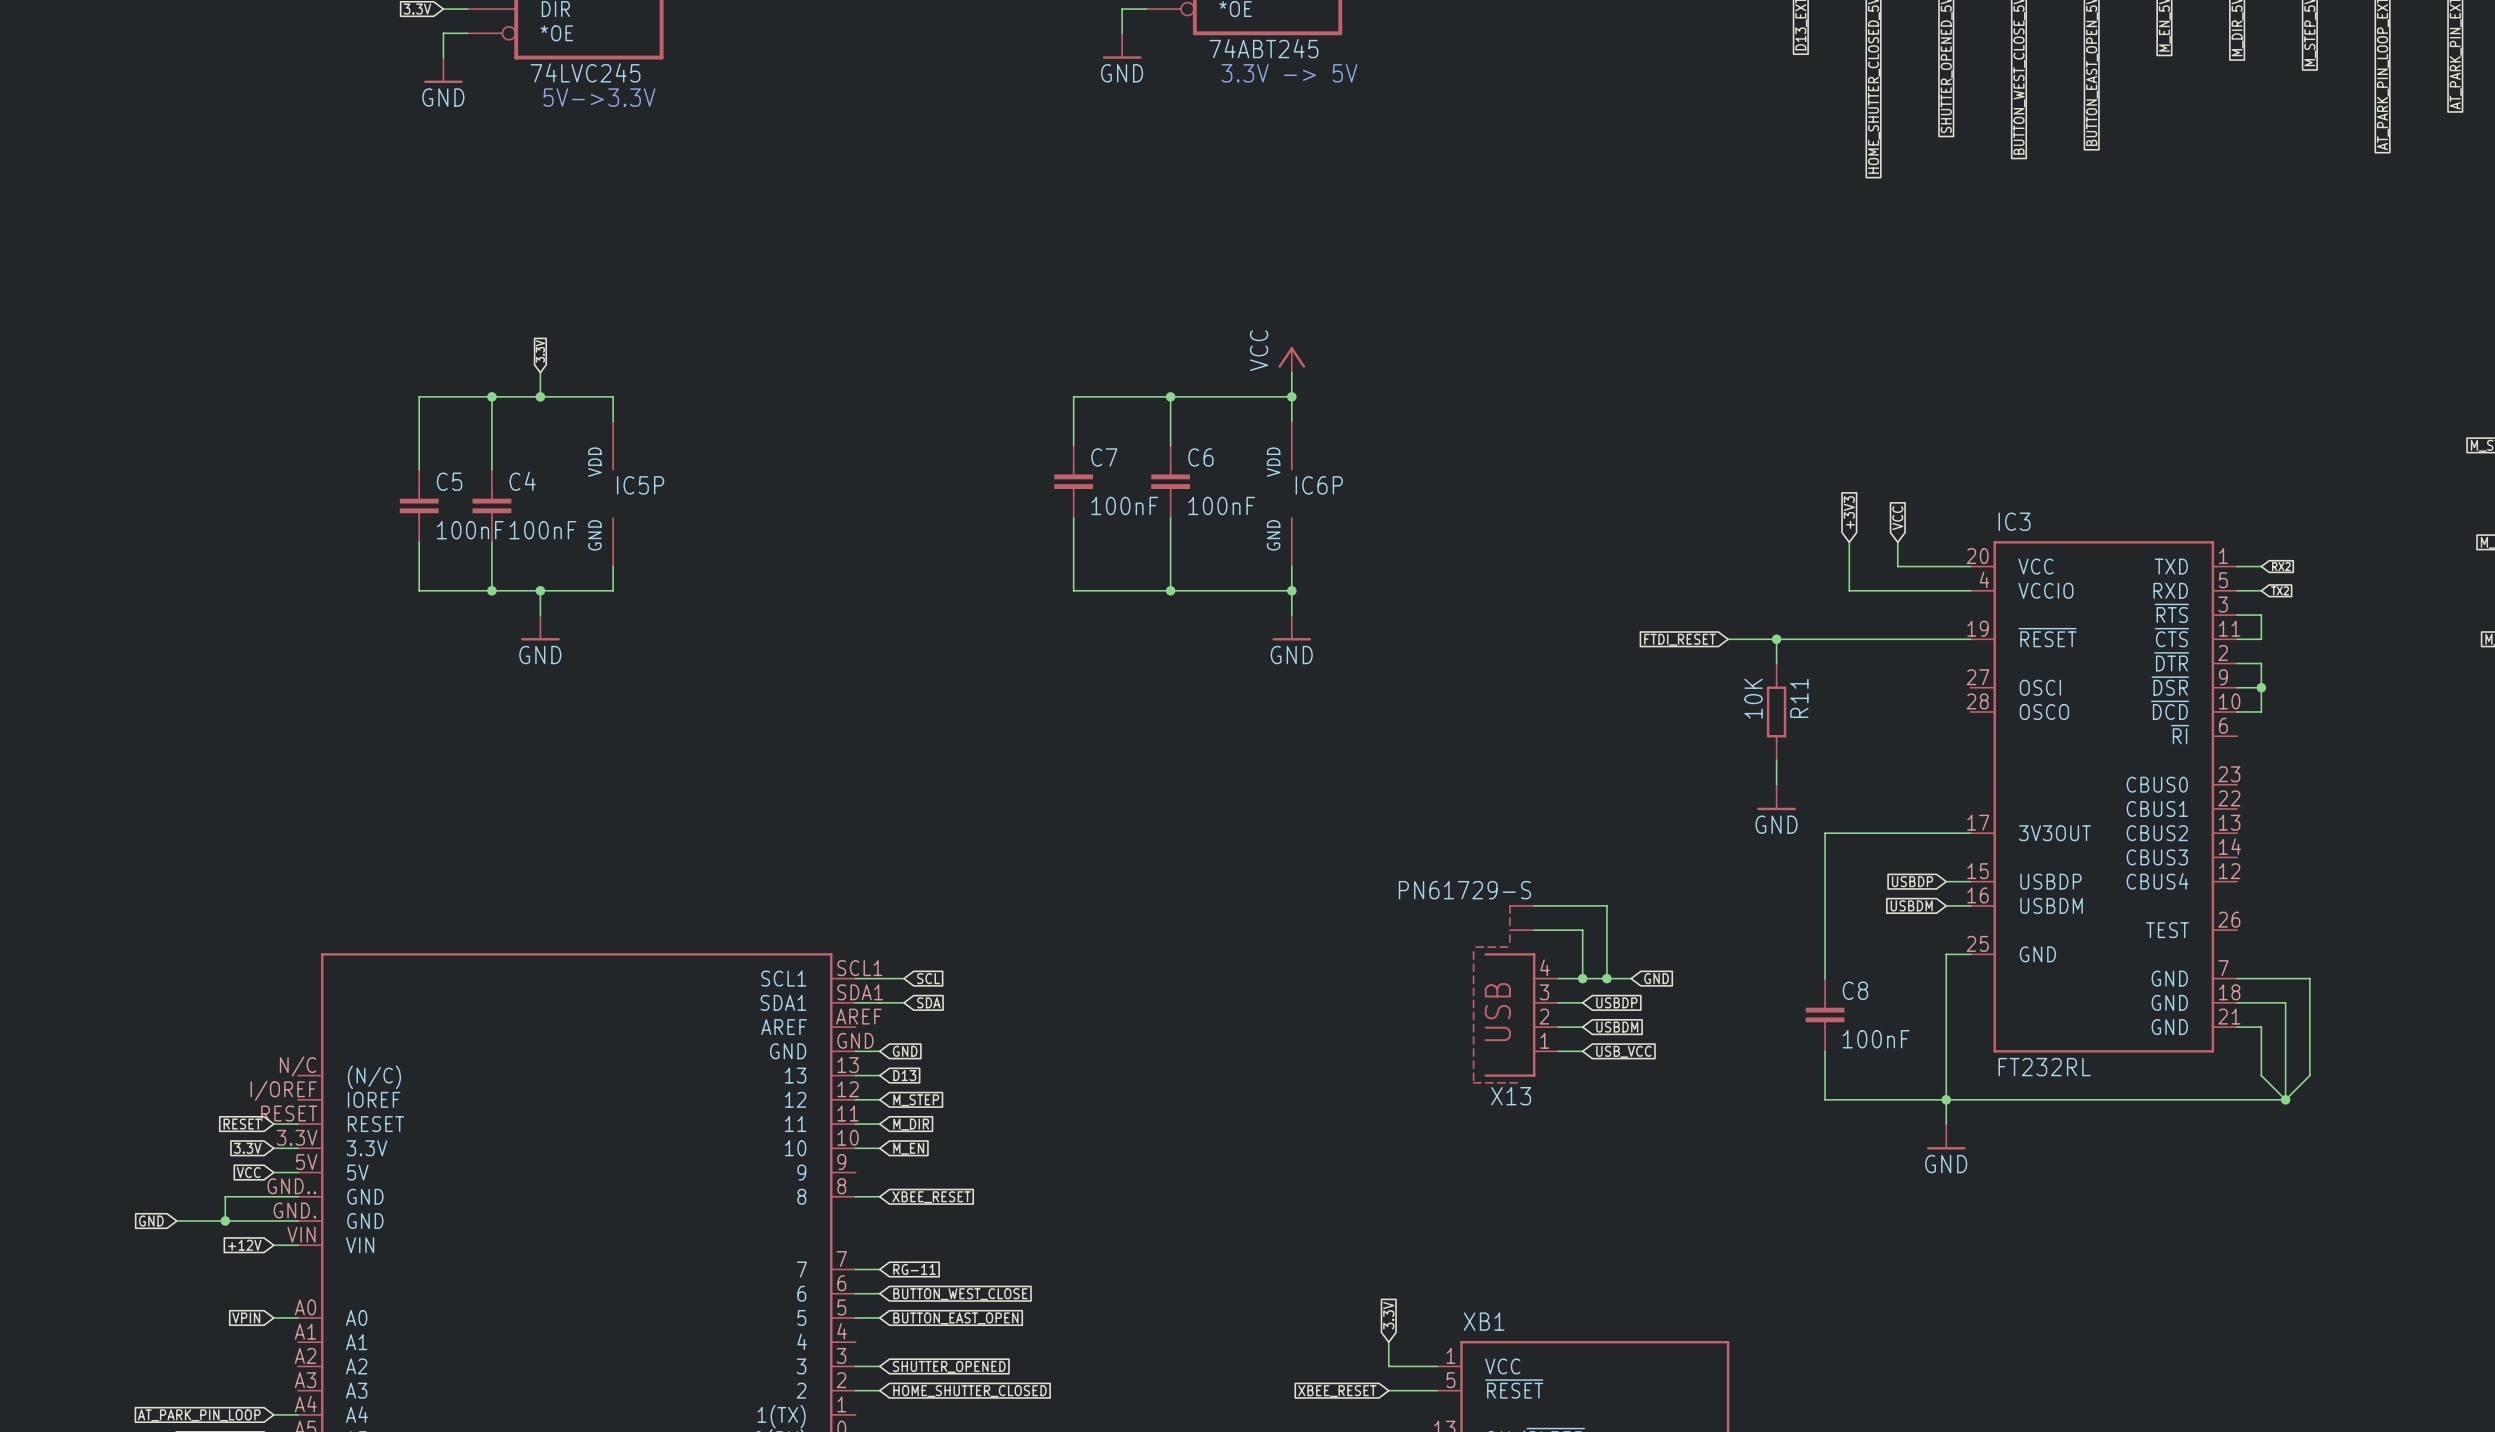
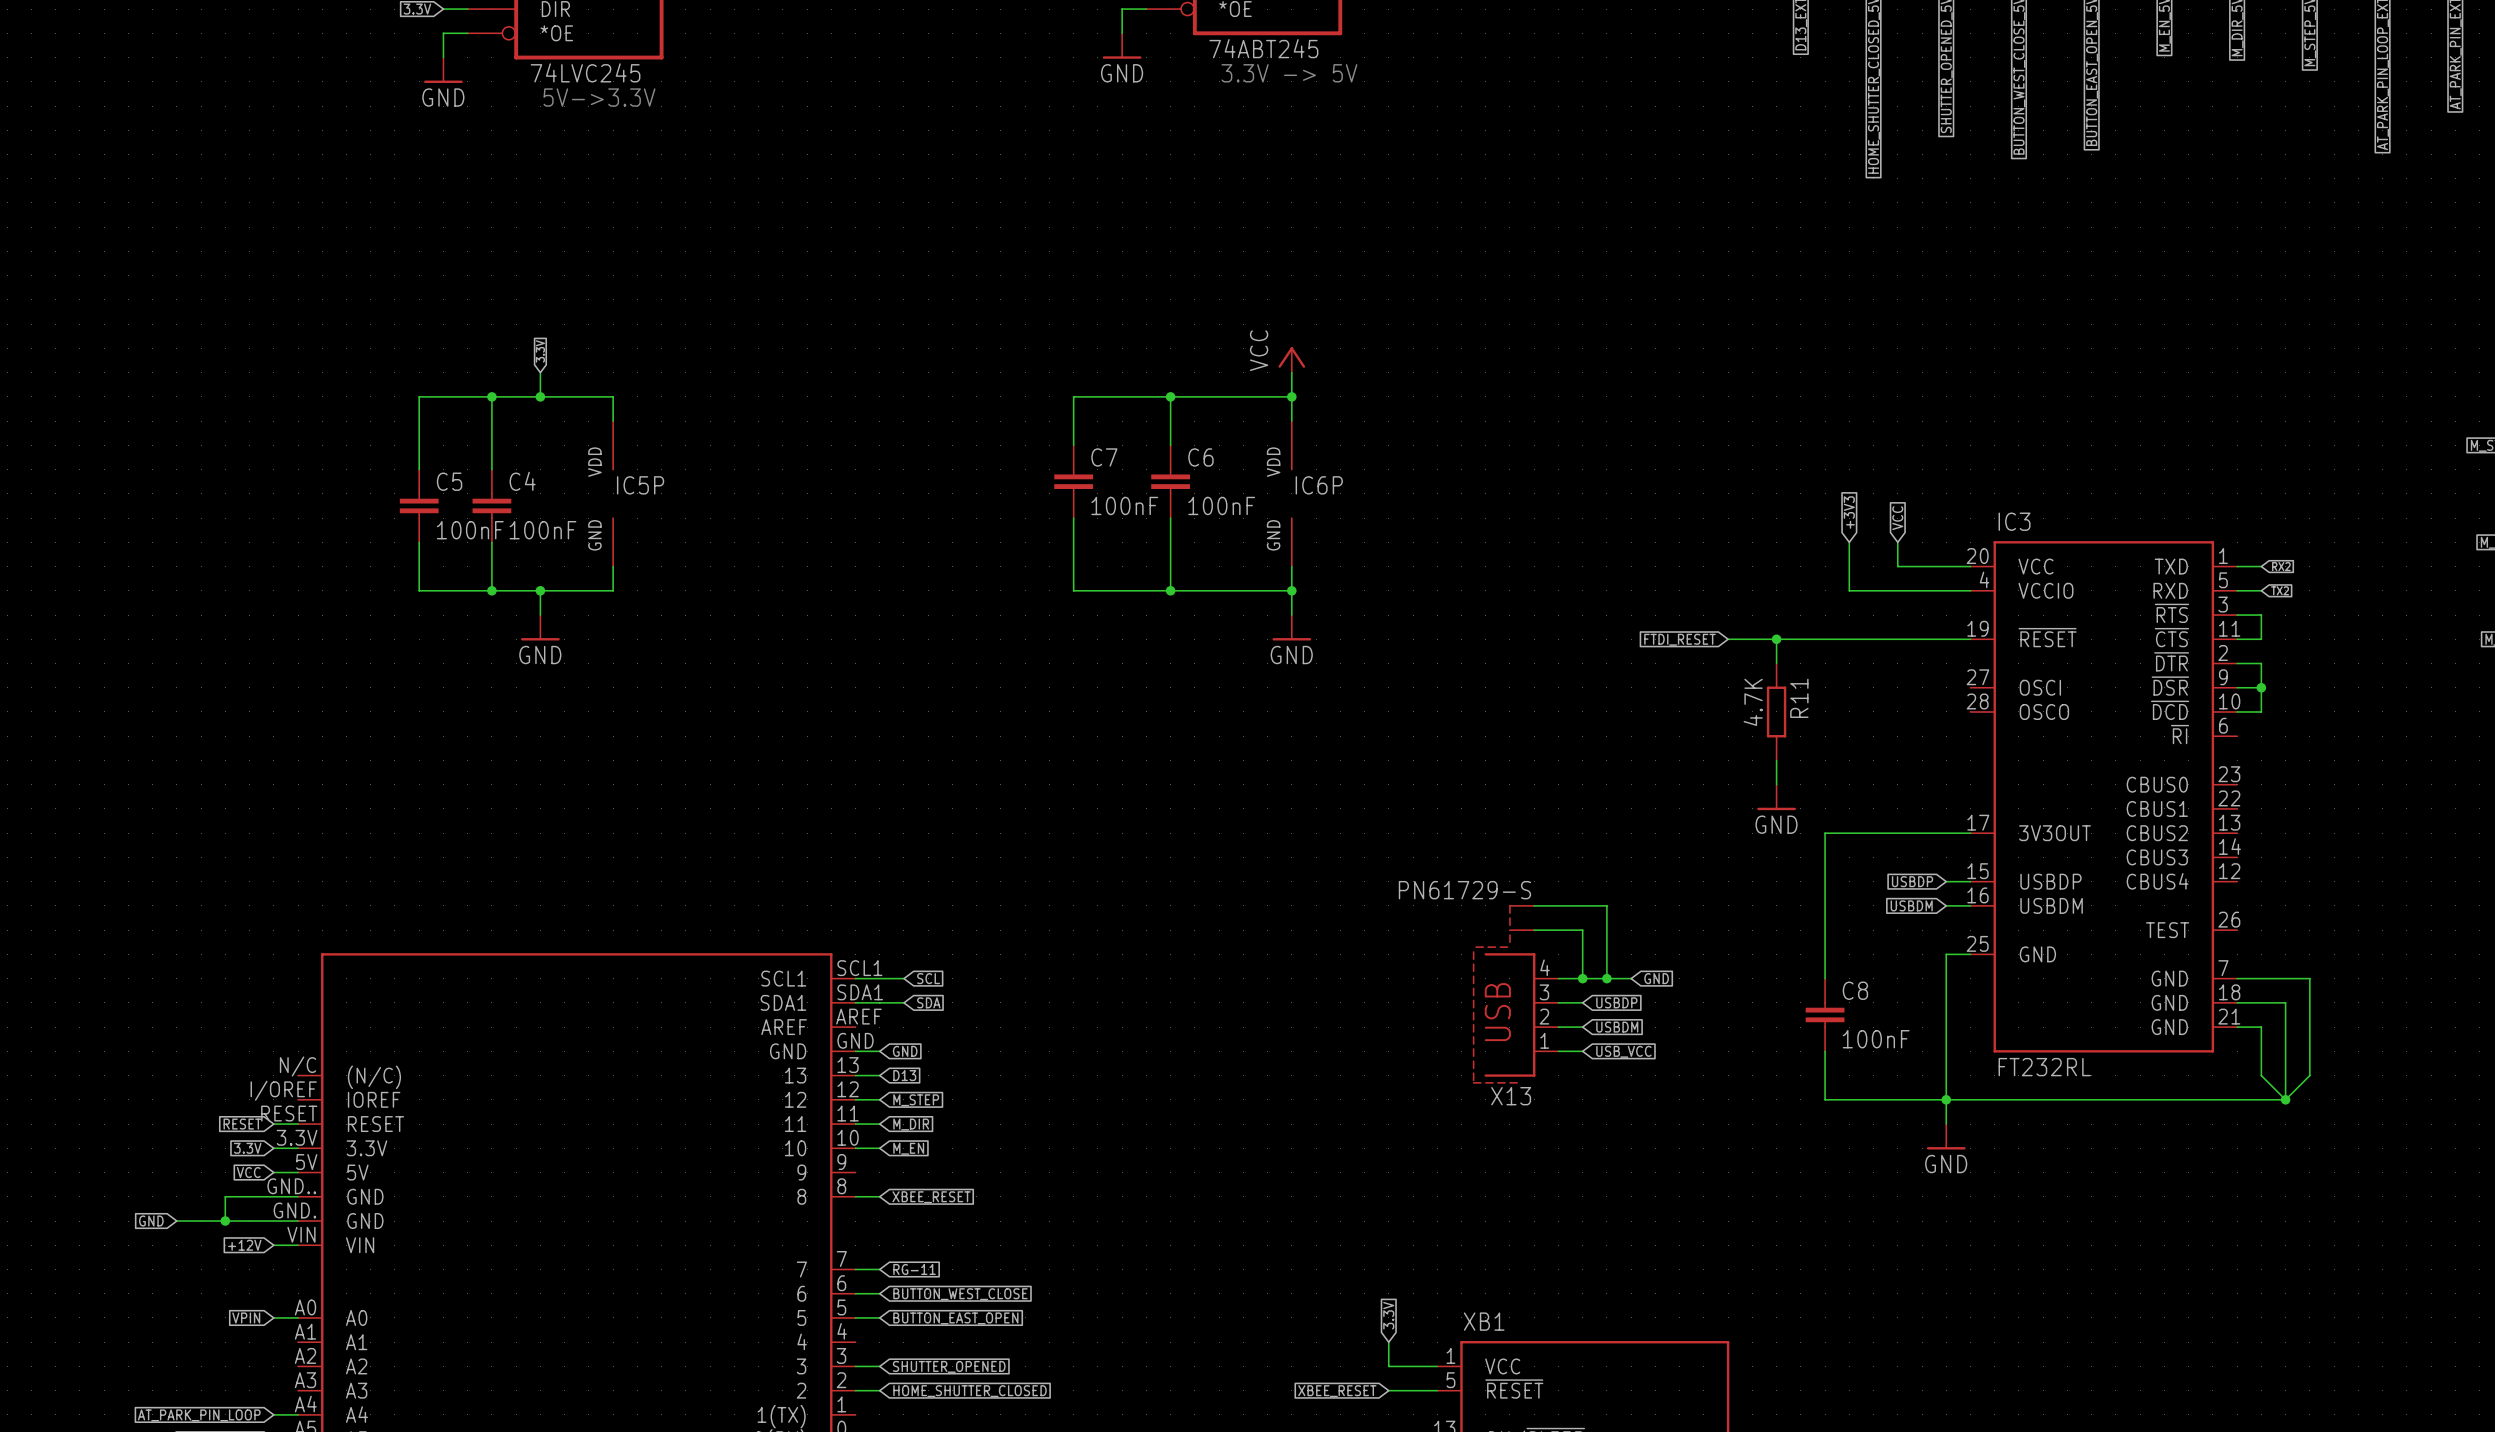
R11 value: 10K (1753, 698) -> 4.7K (1753, 702)

